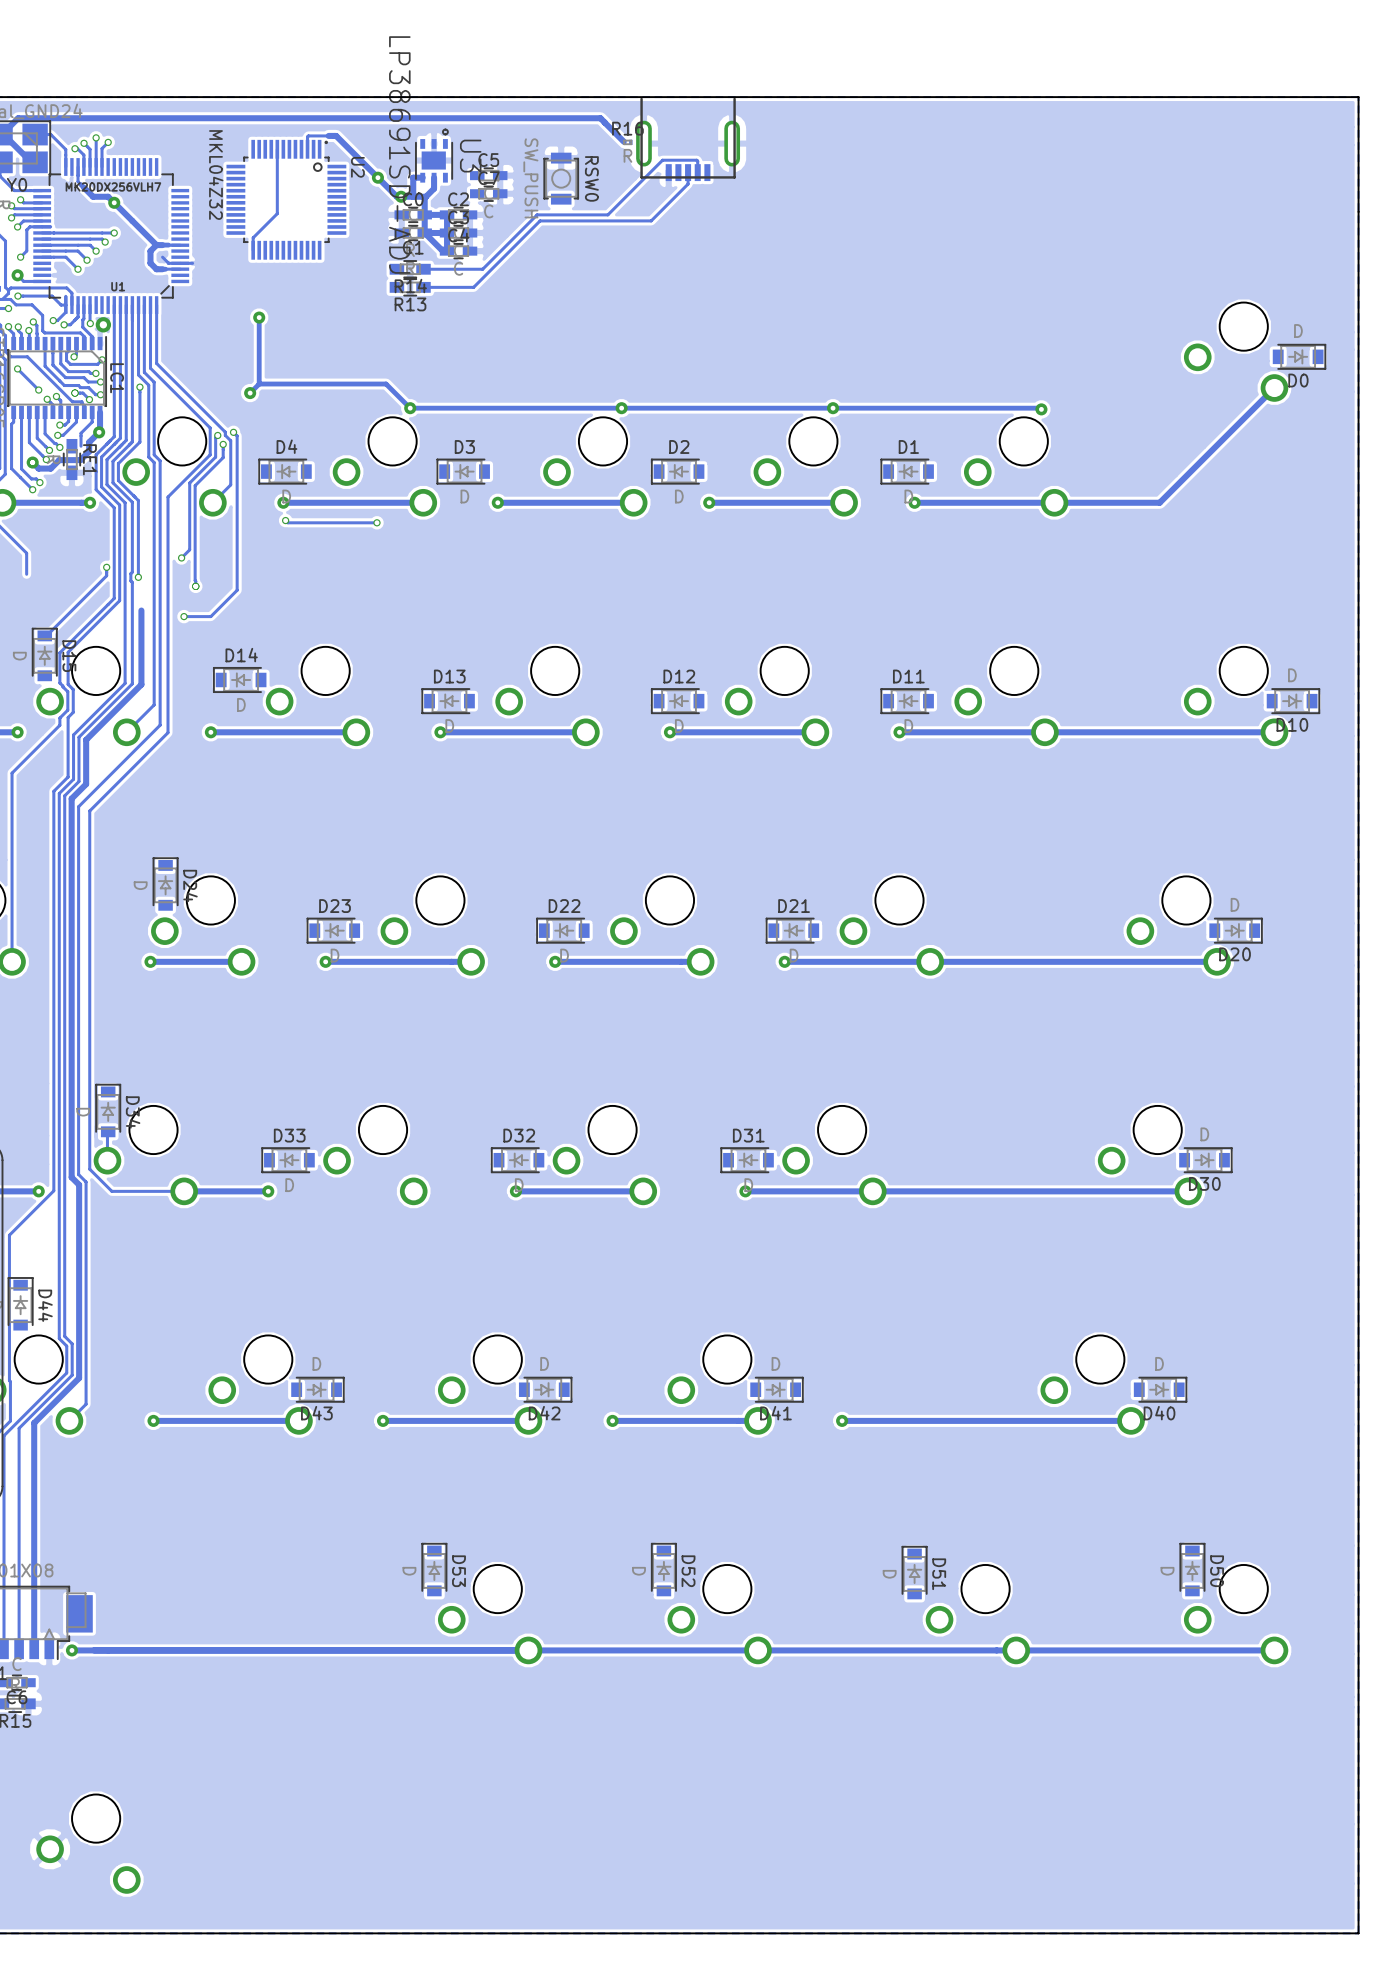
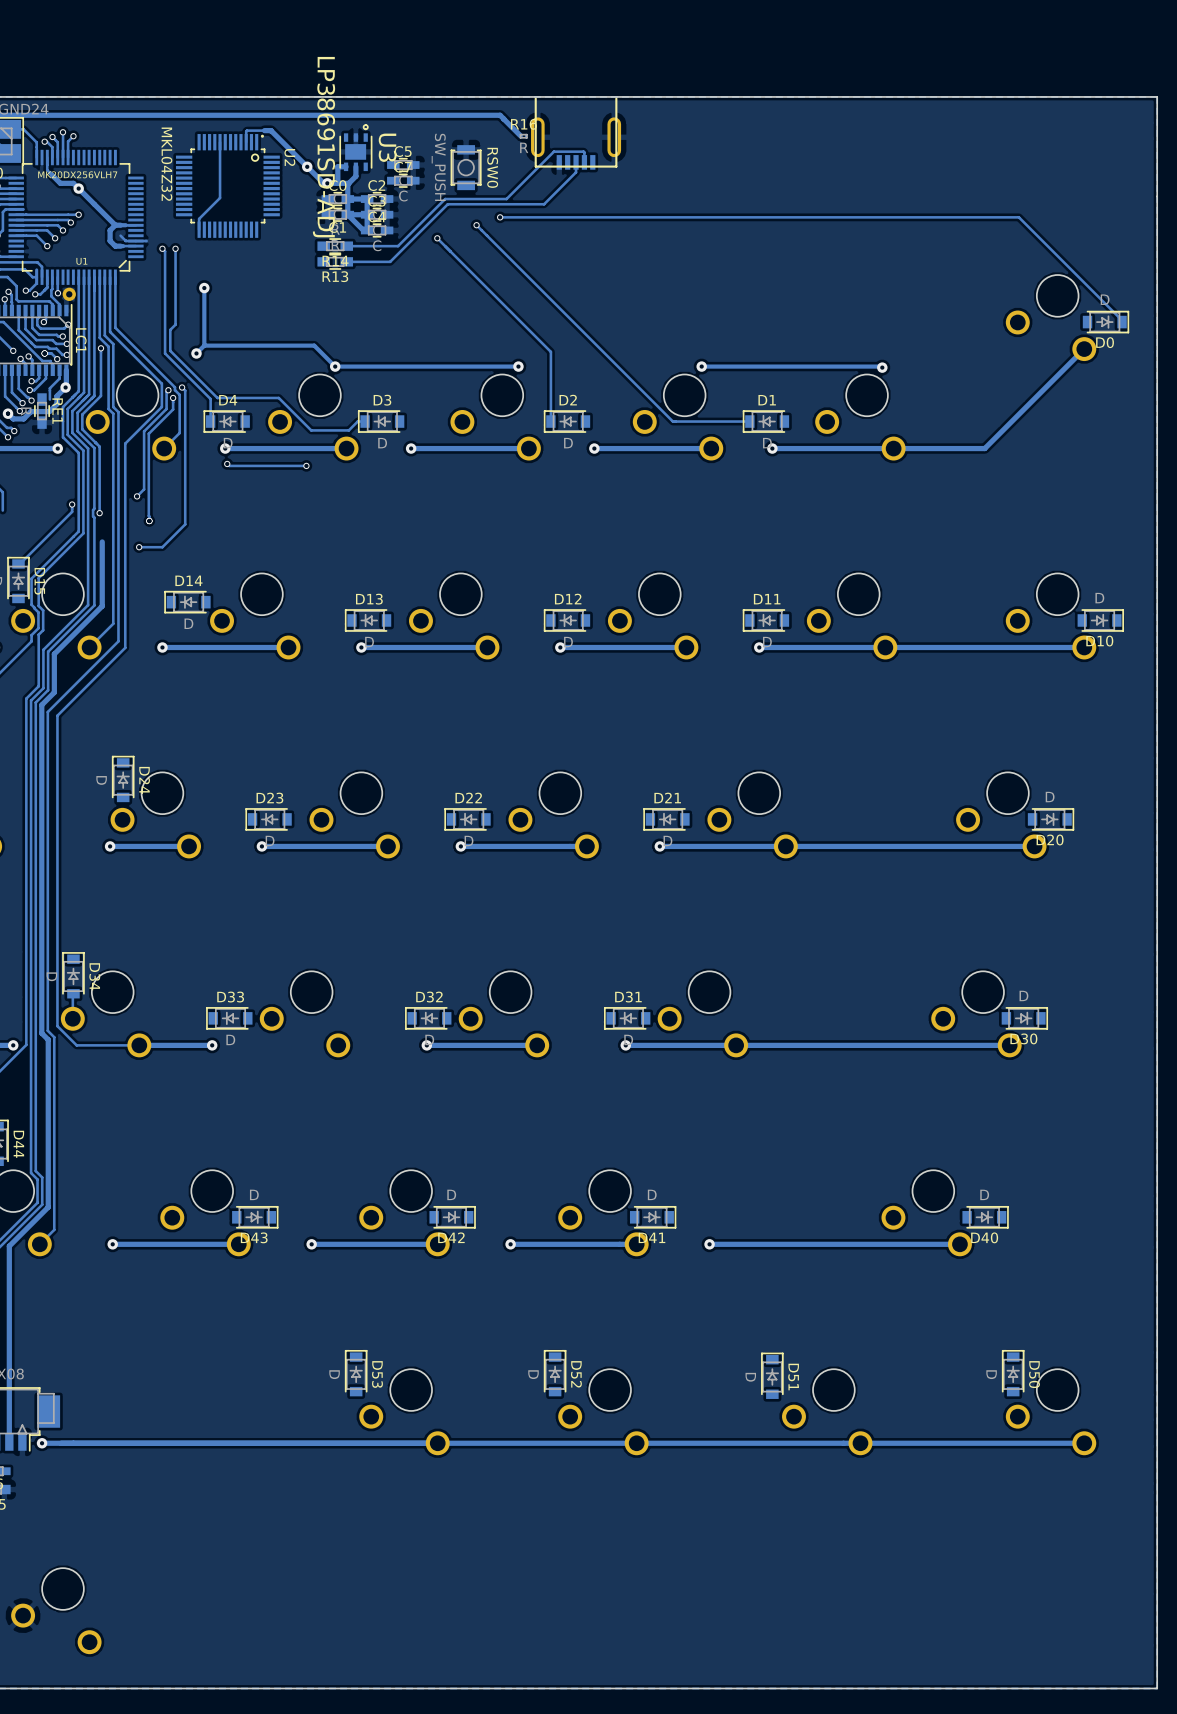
track: none -> (500, 217) (1018, 217) (1122, 322)
via: none -> (500, 217)
track: none -> (476, 225) (672, 421) (749, 421)
via: none -> (476, 225)
track: none -> (437, 238) (550, 351) (550, 421)
via: none -> (437, 238)
track: none -> (162, 248) (165, 251) (165, 353) (210, 399) (210, 421)
via: none -> (162, 248)
track: none -> (175, 248) (175, 324) (170, 329) (170, 350) (217, 397) (278, 397) (311, 430) (348, 430) (357, 421) (365, 421)
via: none -> (175, 248)
track: (833, 408) (621, 408) -> none

